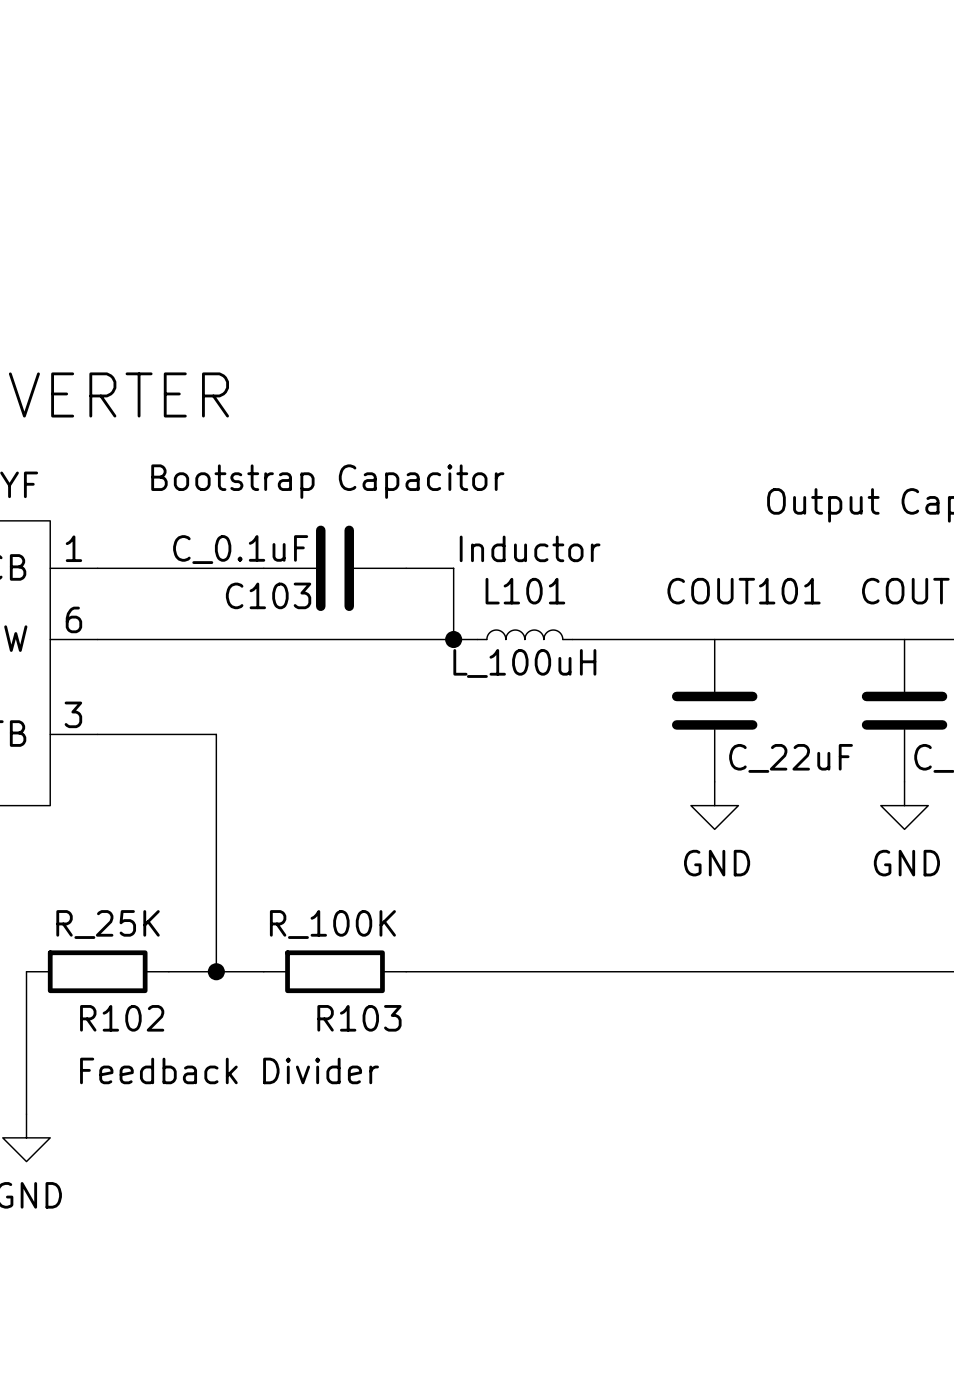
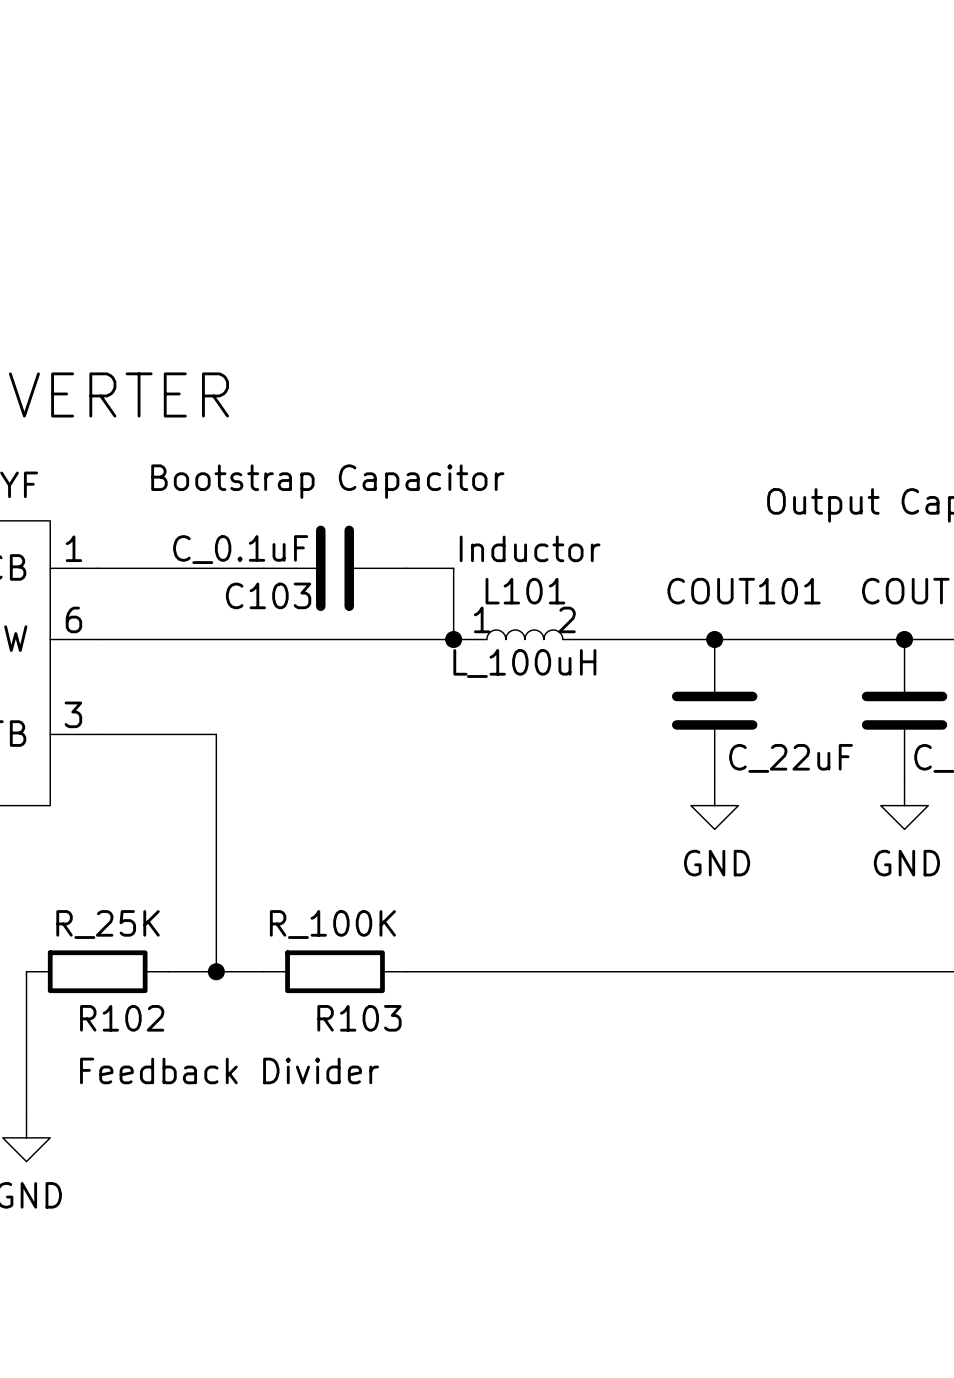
L101 pin number: none -> 1 (482, 619)
L101 pin number: none -> 2 (566, 619)
junction: none -> (714, 639)
junction: none -> (904, 639)

